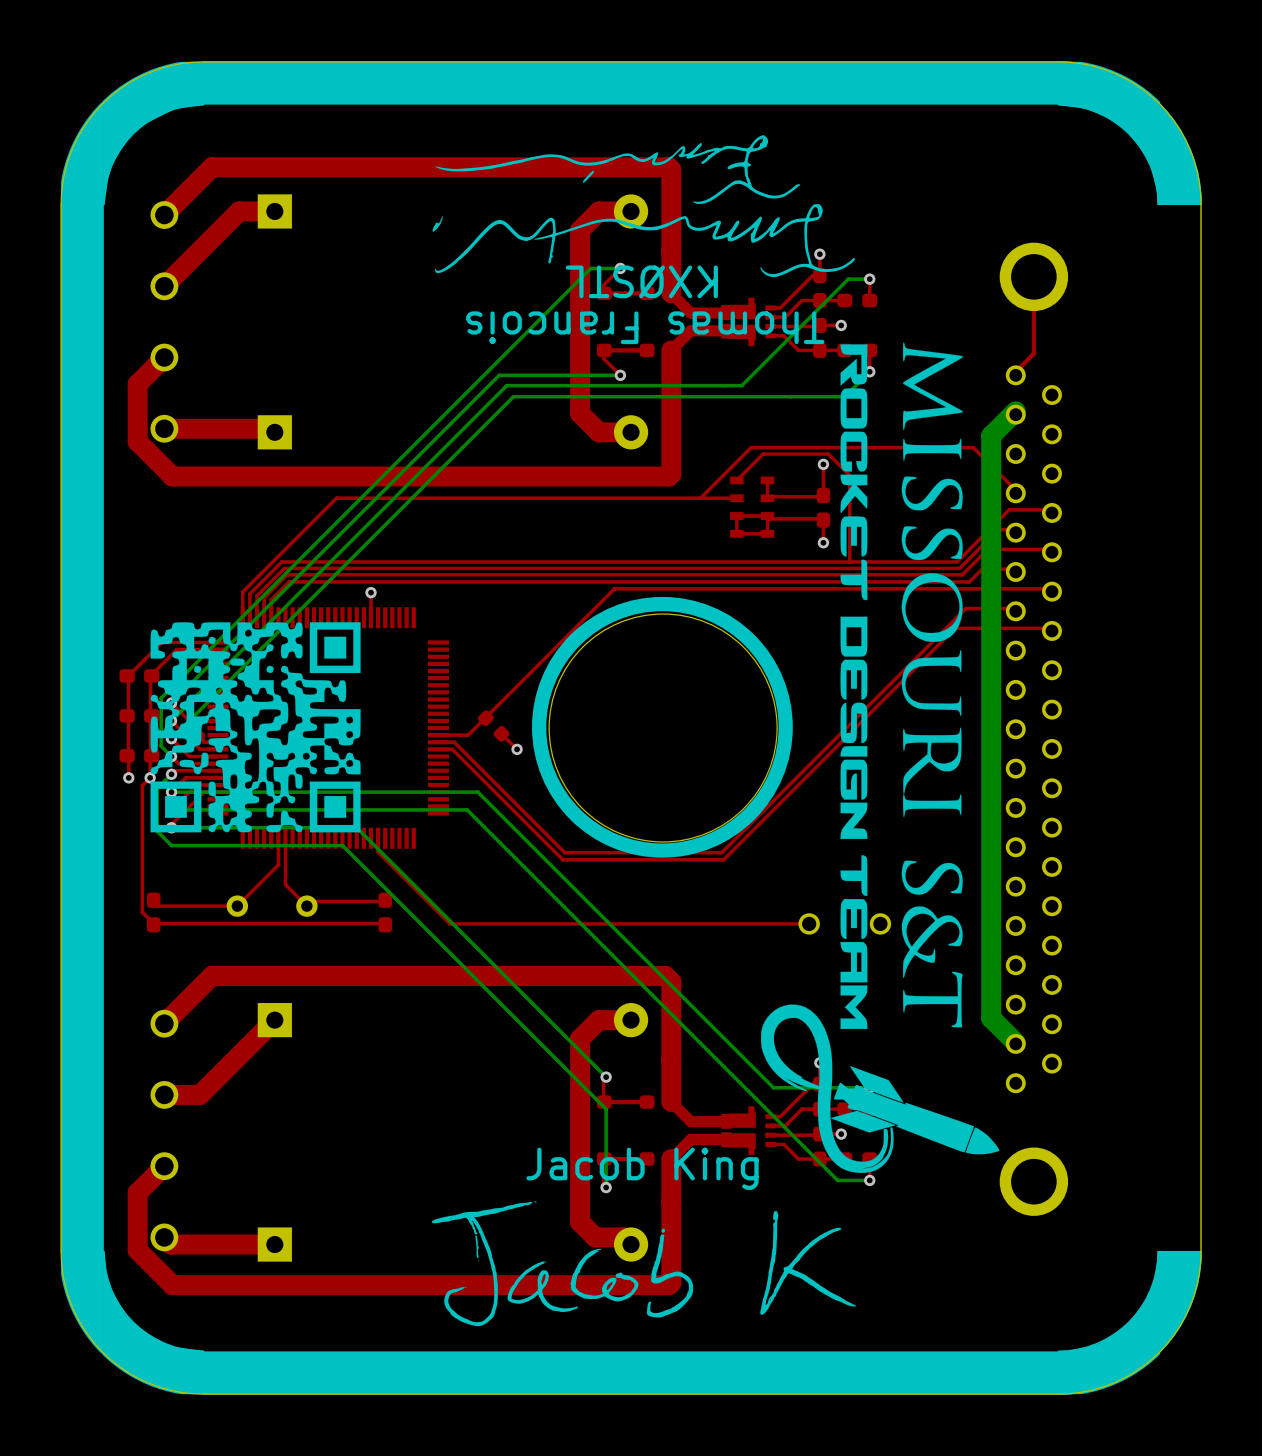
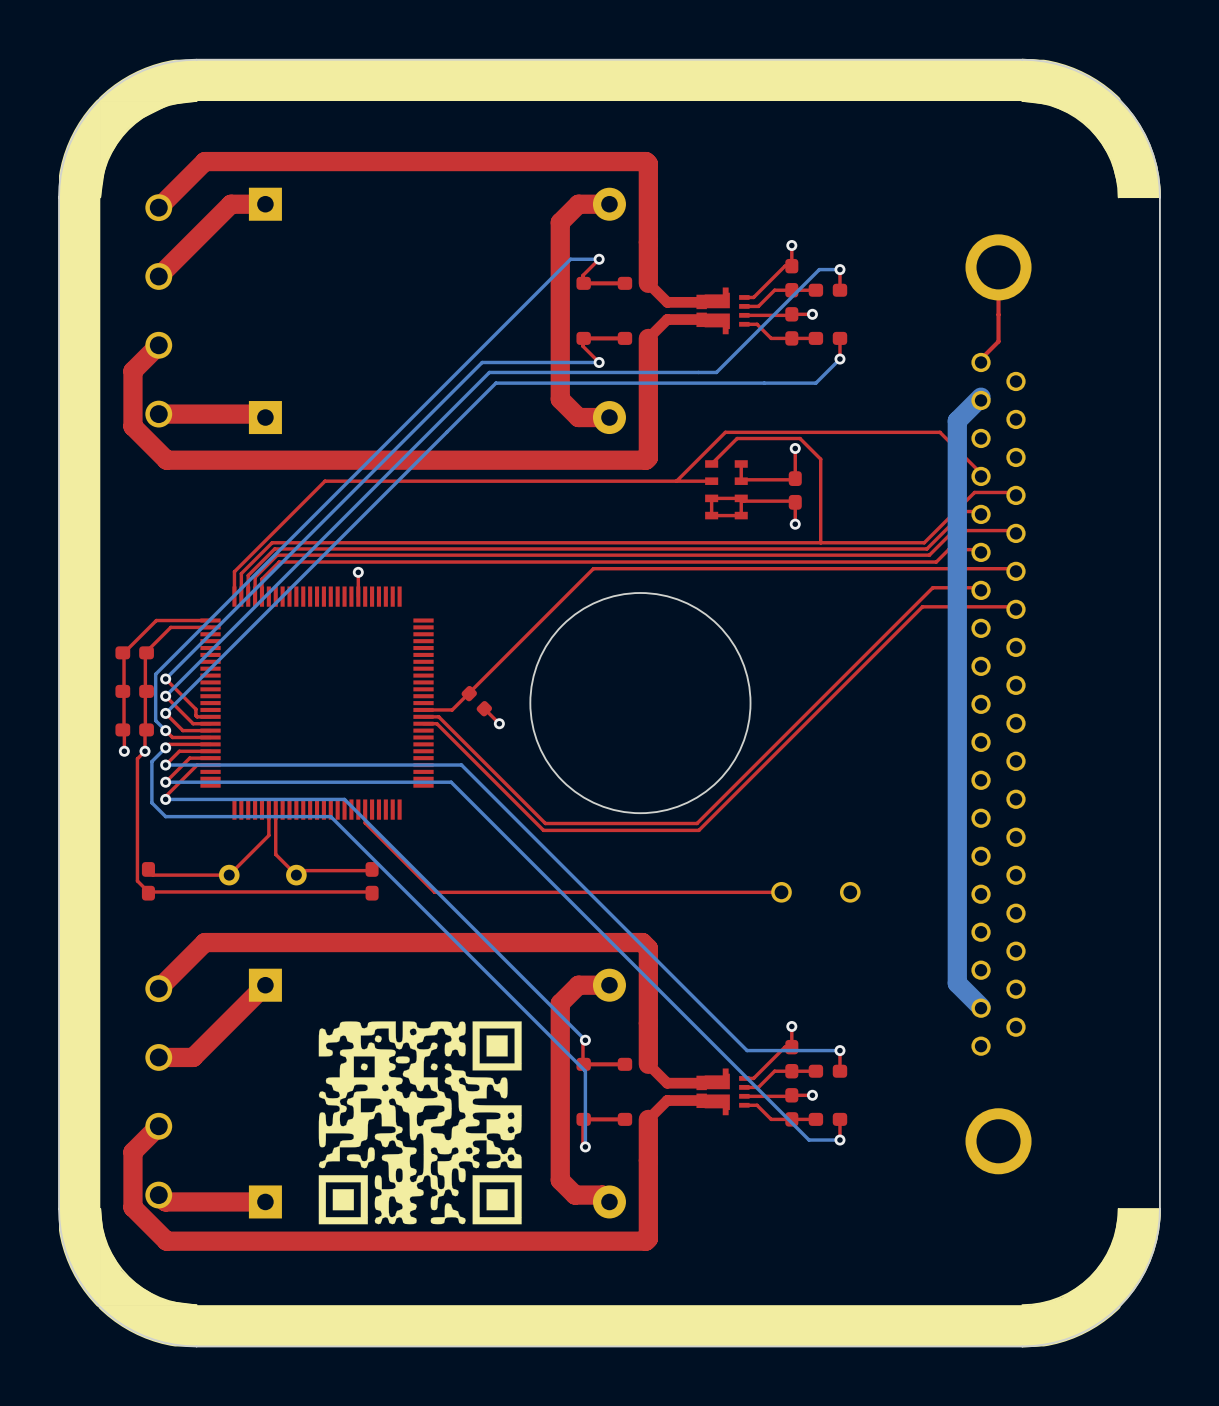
drawing: [432, 135, 856, 278] -> none
text: KXØSTL (641, 281) -> none
text: Thomas Francois (645, 327) -> none
drawing: [532, 342, 1000, 1174] -> none
drawing: [150, 622, 361, 833] -> none
drawing: none -> [318, 1021, 522, 1225]
text: Jacob King (642, 1168) -> none
drawing: [431, 1201, 856, 1327] -> none

